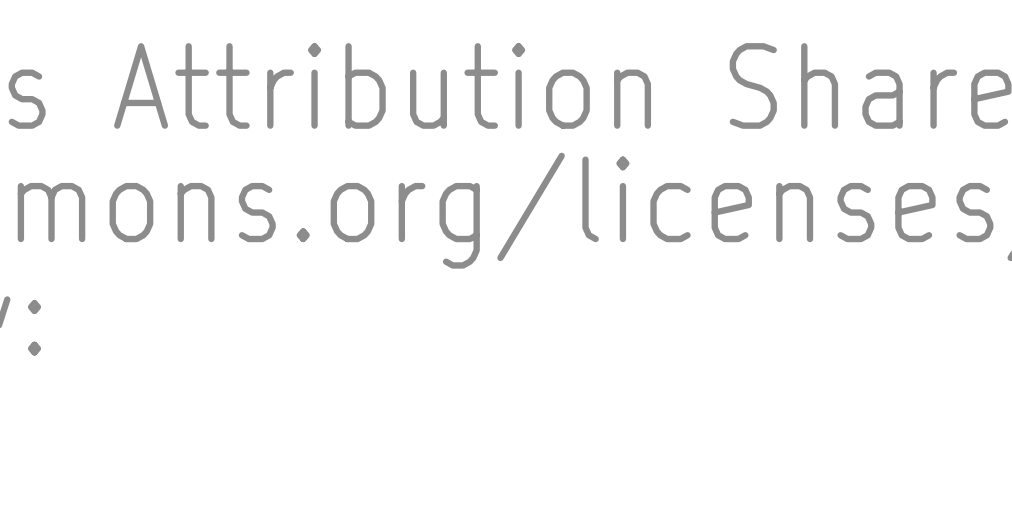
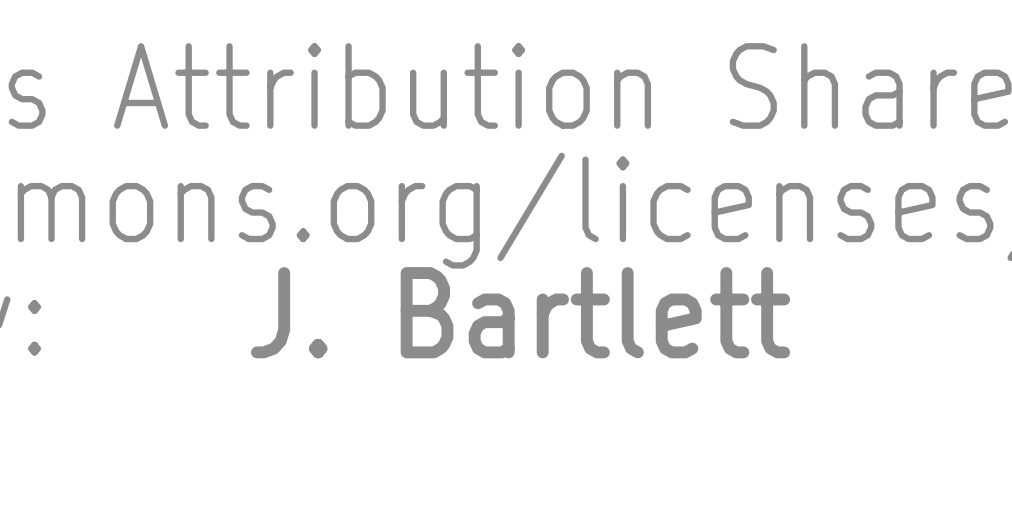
text: none -> J. Bartlett (520, 312)

